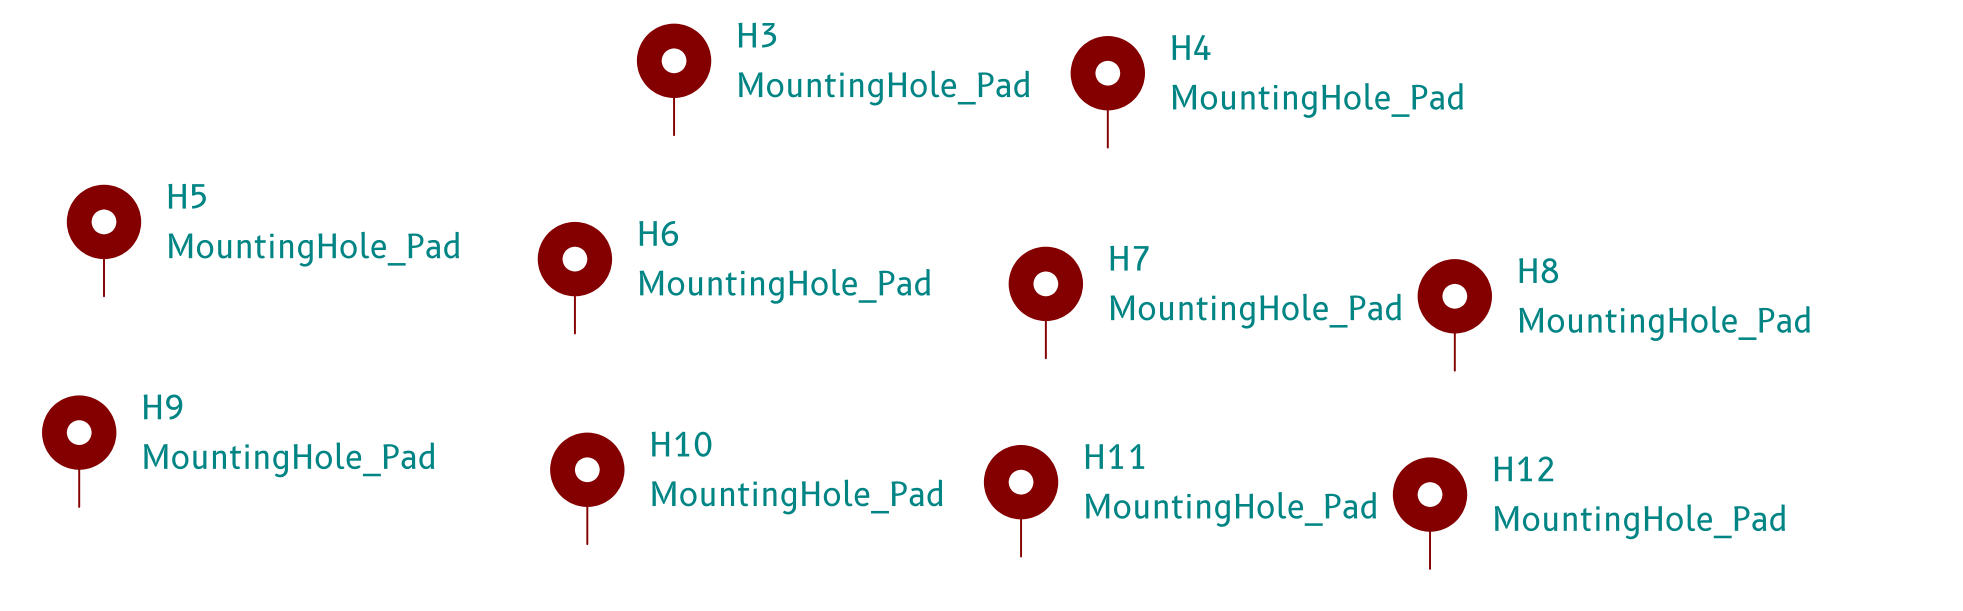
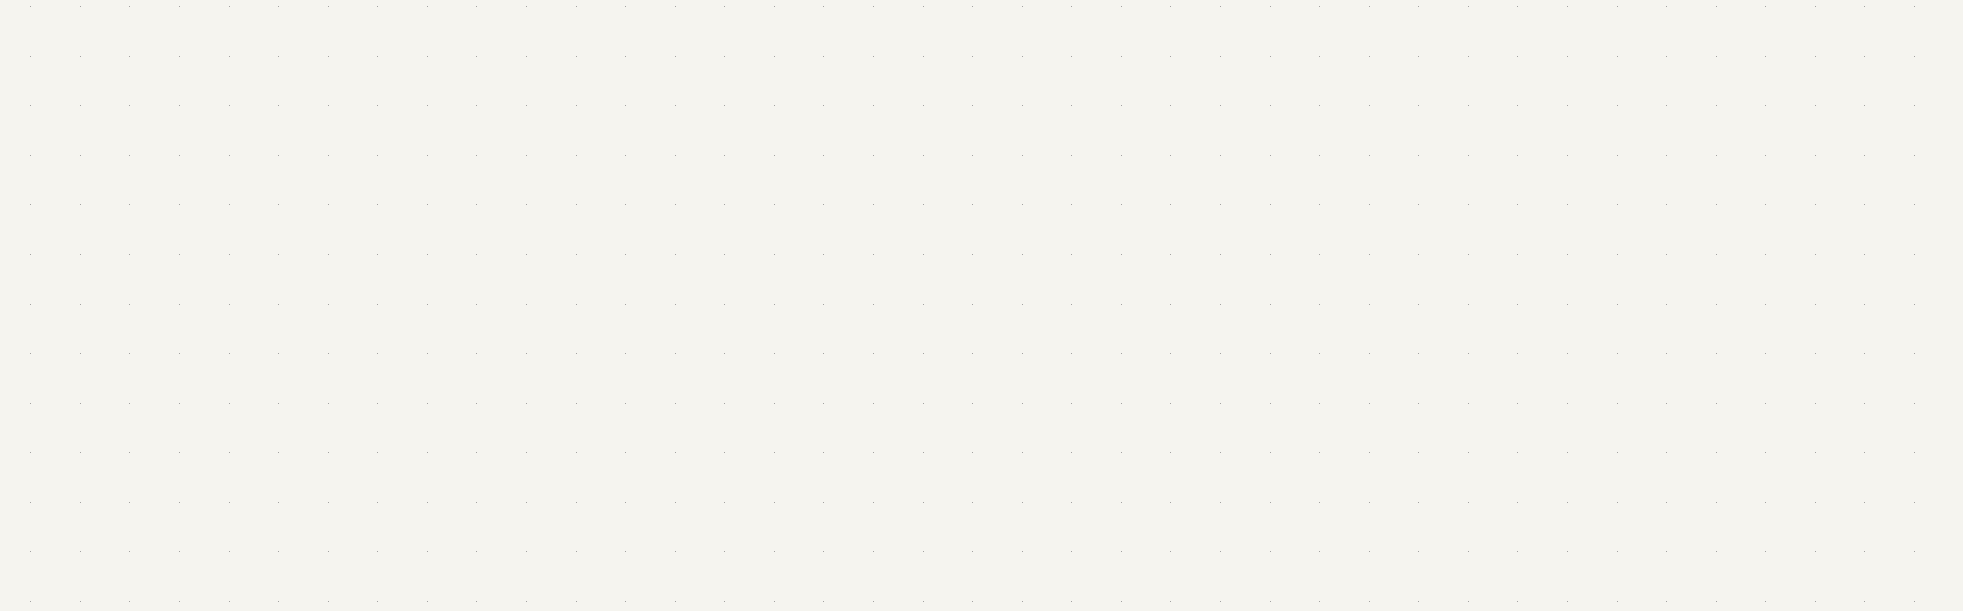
H3: MountingHole_Pad (674, 79) -> none
H4: MountingHole_Pad (1107, 91) -> none
H5: MountingHole_Pad (104, 240) -> none
H6: MountingHole_Pad (574, 277) -> none
H7: MountingHole_Pad (1045, 302) -> none
H8: MountingHole_Pad (1454, 314) -> none
H9: MountingHole_Pad (79, 451) -> none
H10: MountingHole_Pad (587, 488) -> none
H11: MountingHole_Pad (1021, 500) -> none
H12: MountingHole_Pad (1430, 513) -> none

